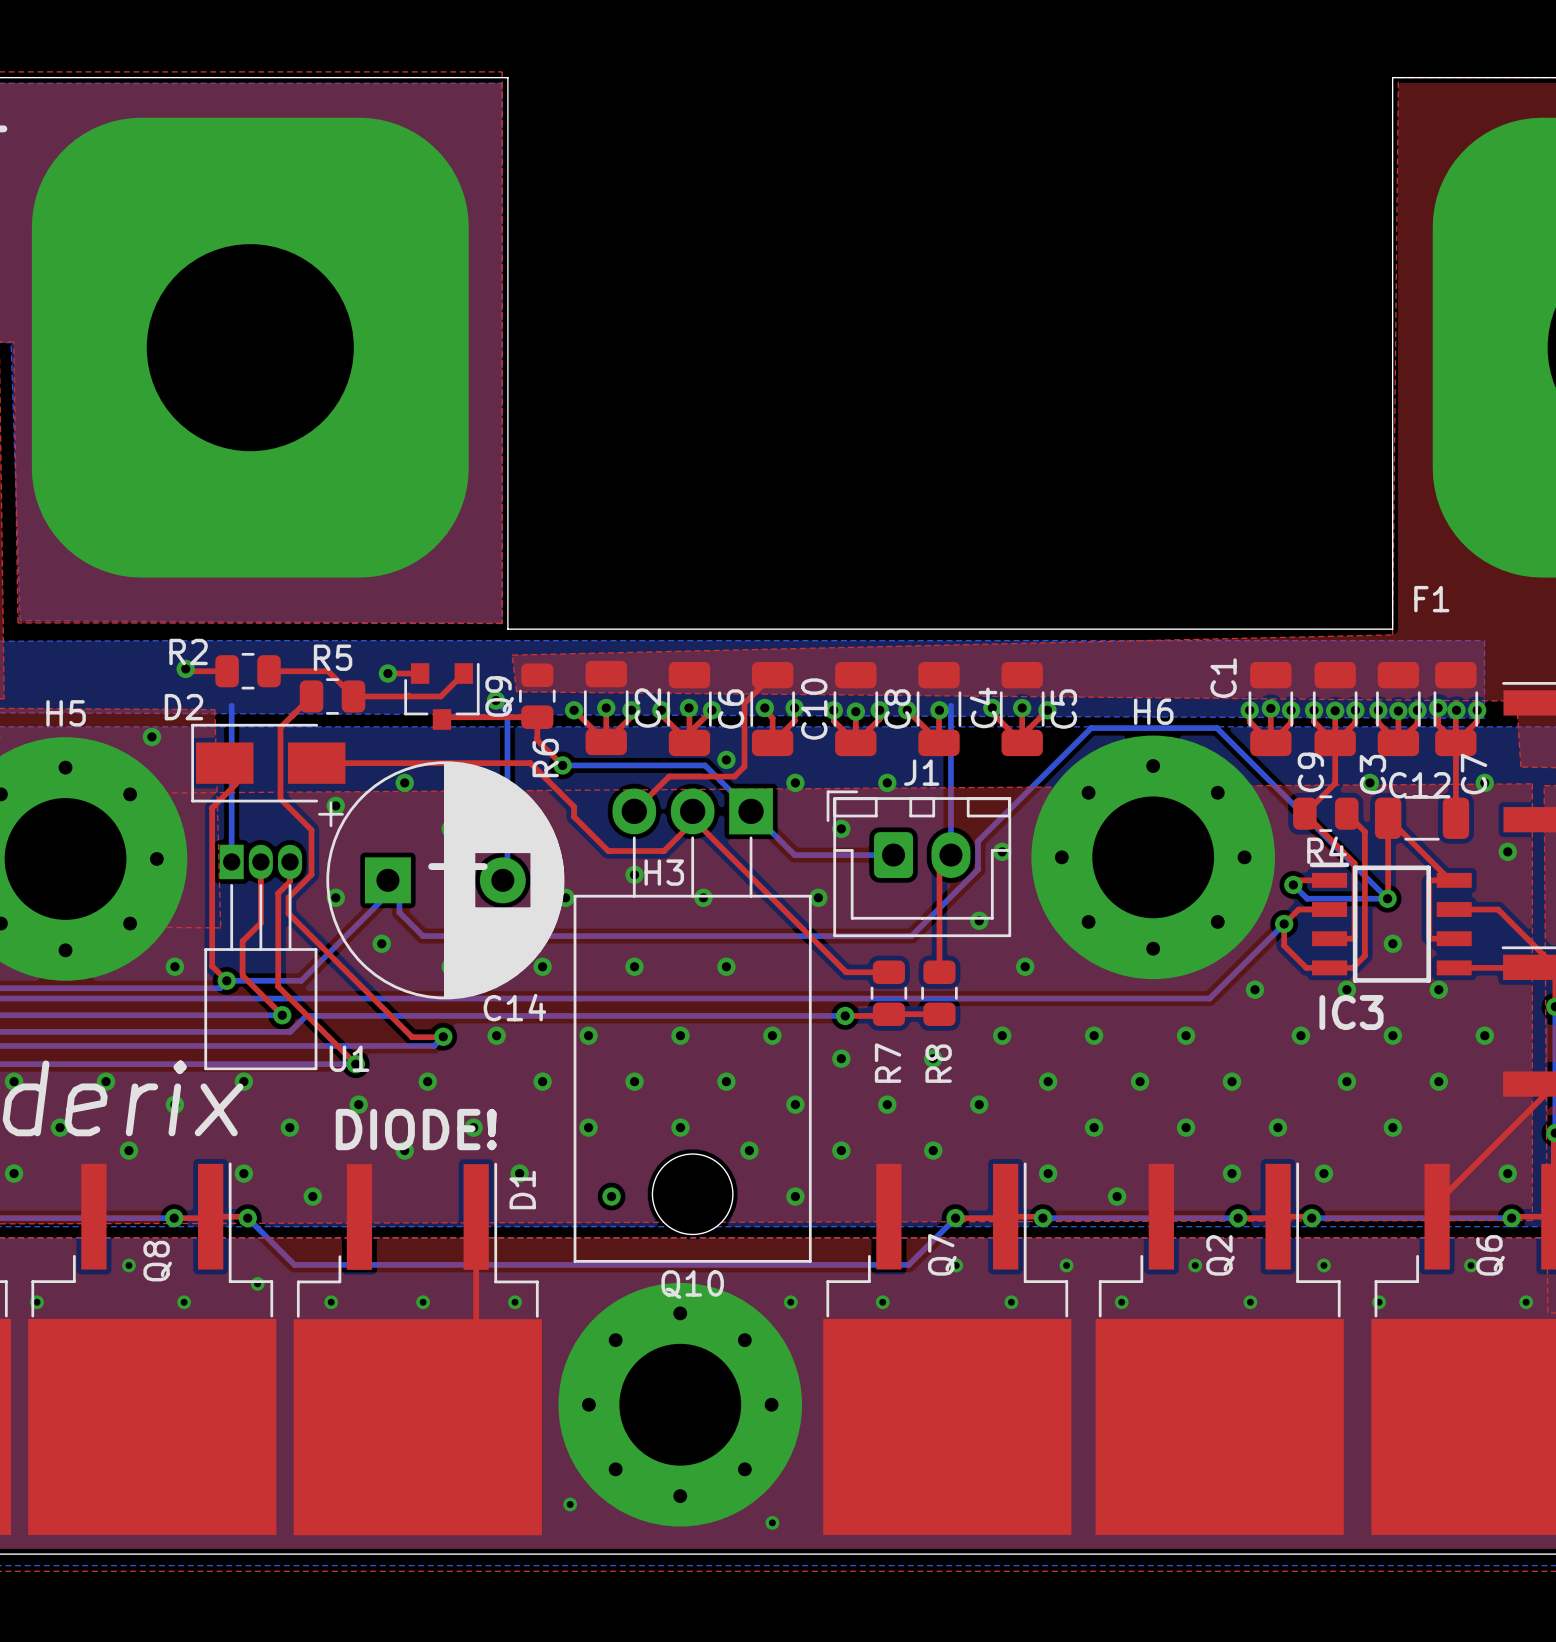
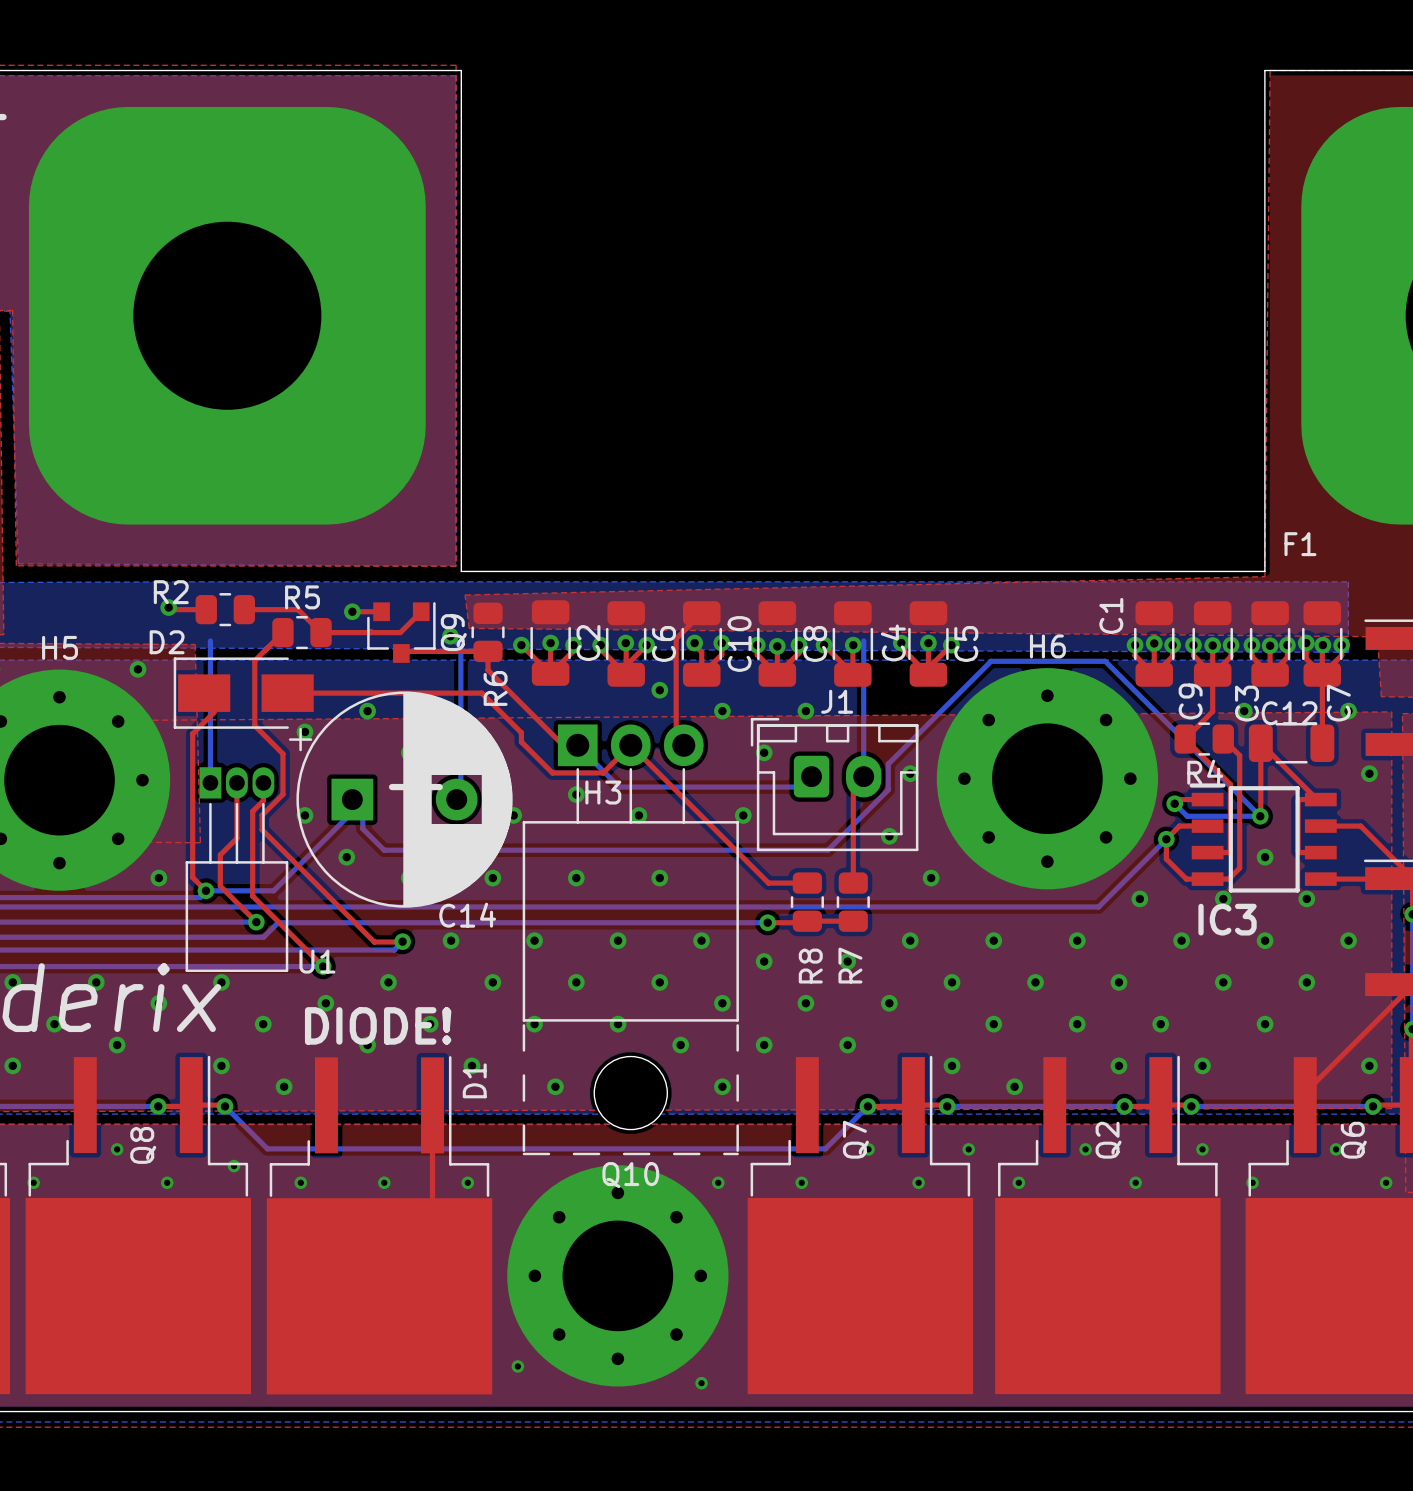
top track: (537, 737) (537, 740) (562, 765) -> (488, 670) (575, 757)
bottom track: (562, 765) (705, 765) (794, 855) (893, 855) -> none
via: (562, 765) -> none
top track: (744, 766) (734, 776) (669, 776) (634, 811) -> (676, 696) (676, 752) (681, 757)
Q10 footprint: [573, 788, 812, 1263] -> [522, 724, 739, 1156]
bottom track: none -> (575, 757) (590, 757) (619, 787) (801, 787)
R7 name position: R7 (888, 1063) -> R7 (850, 965)
R8 name position: R8 (938, 1063) -> R8 (810, 966)

